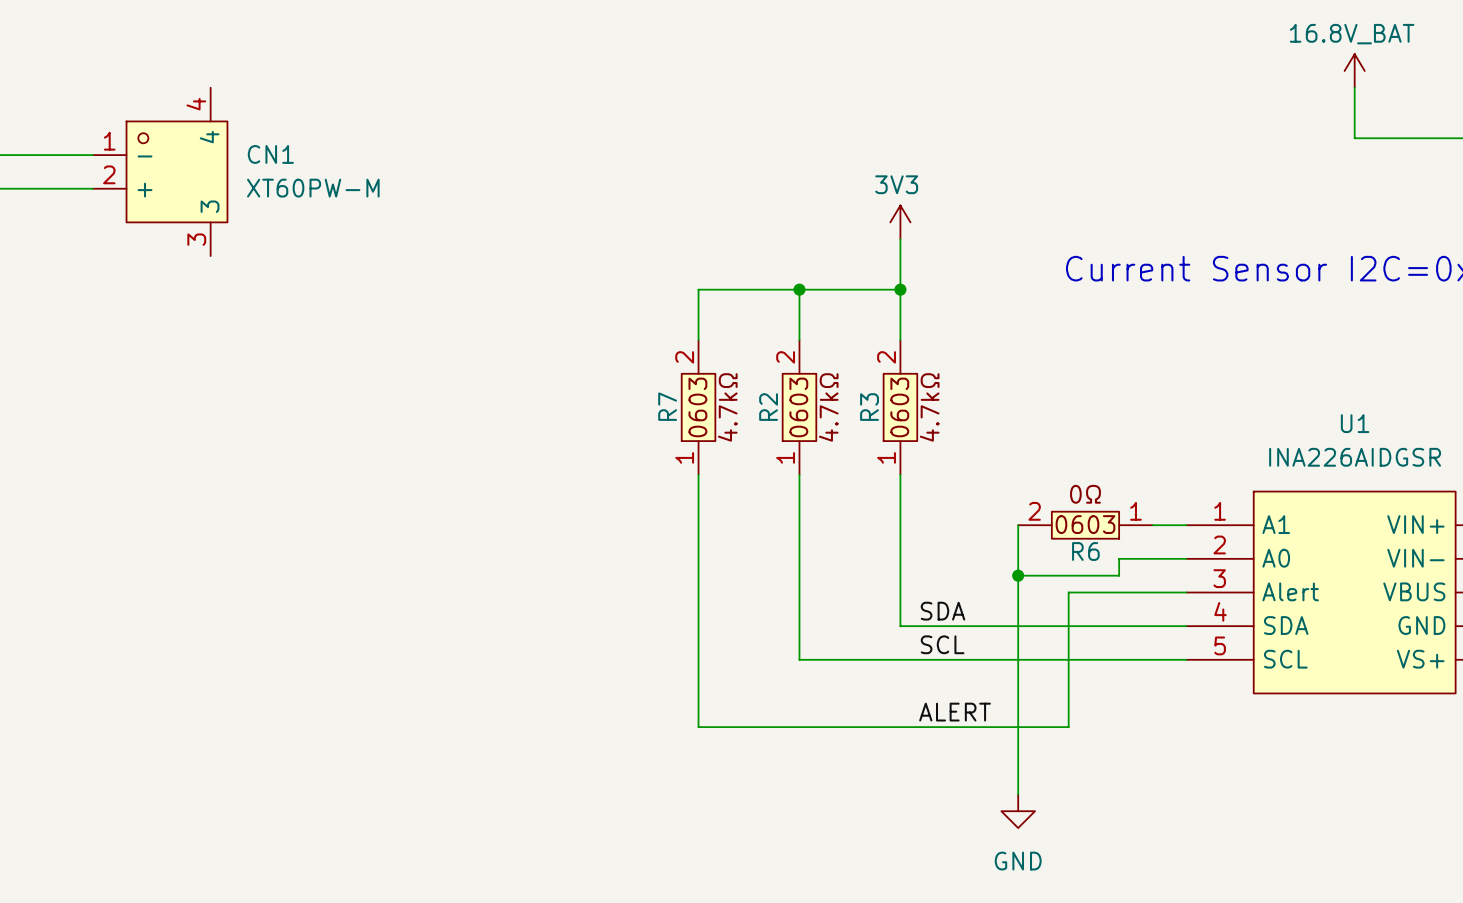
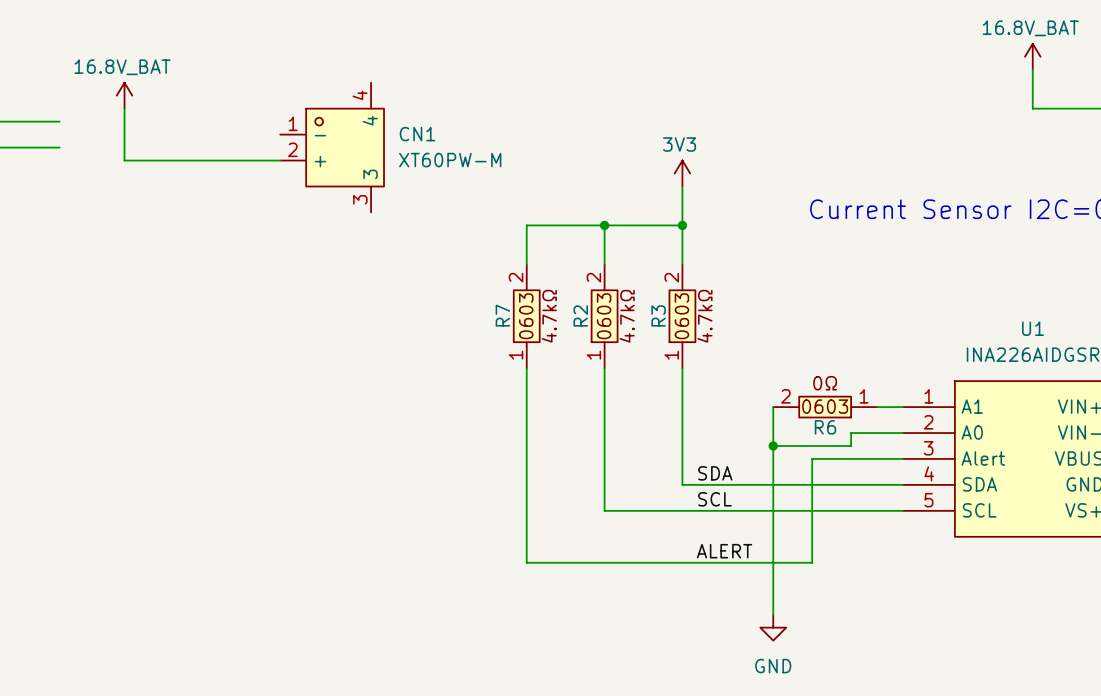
power symbol: none -> 16.8V_BAT (124, 95)
wire: none -> (124, 108) (124, 160) (280, 160)
CN1 position: (160, 171) -> (332, 147)

